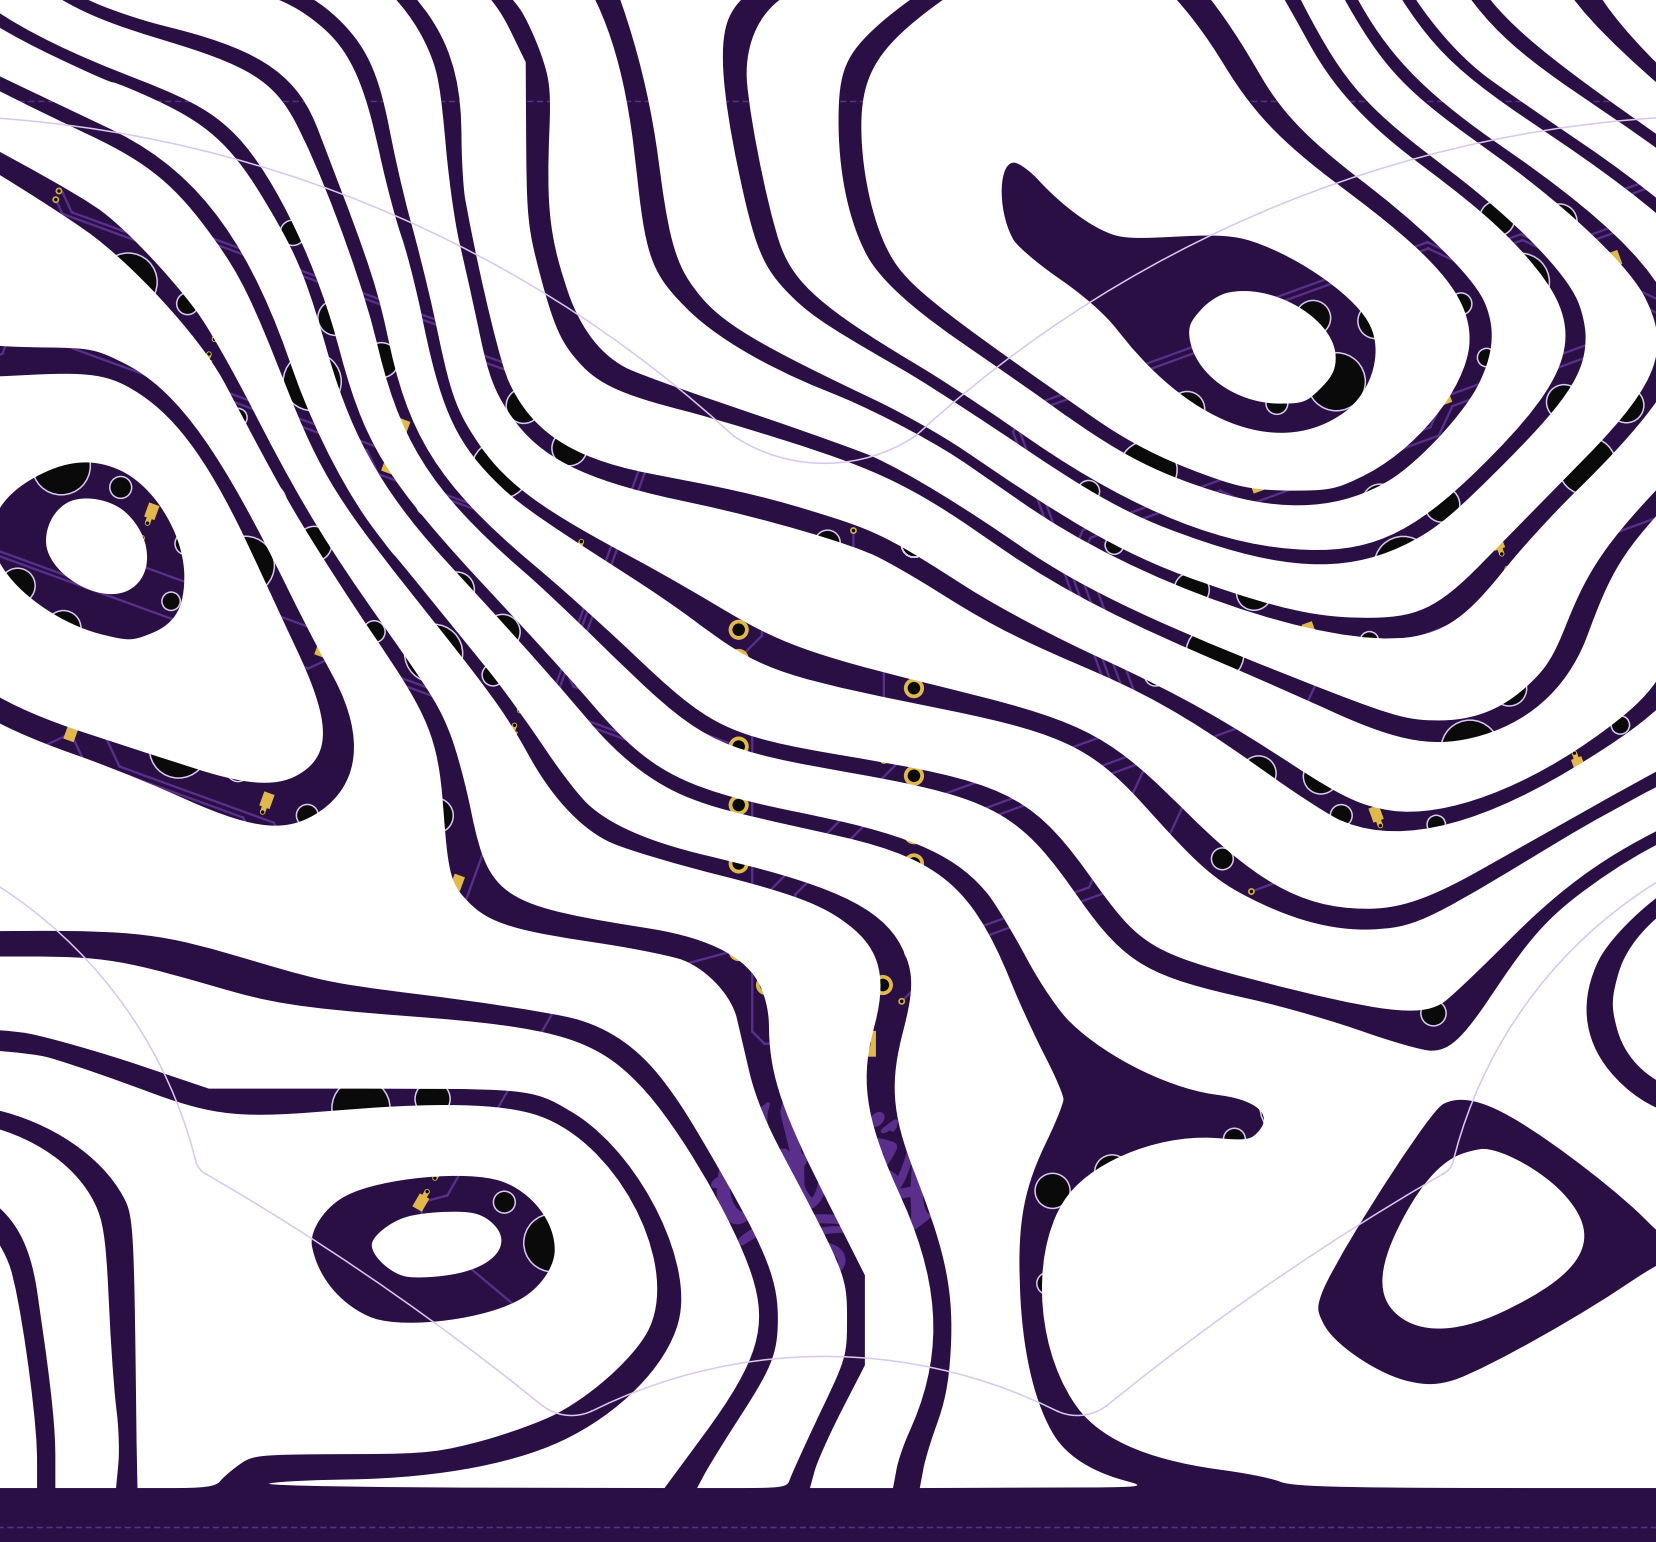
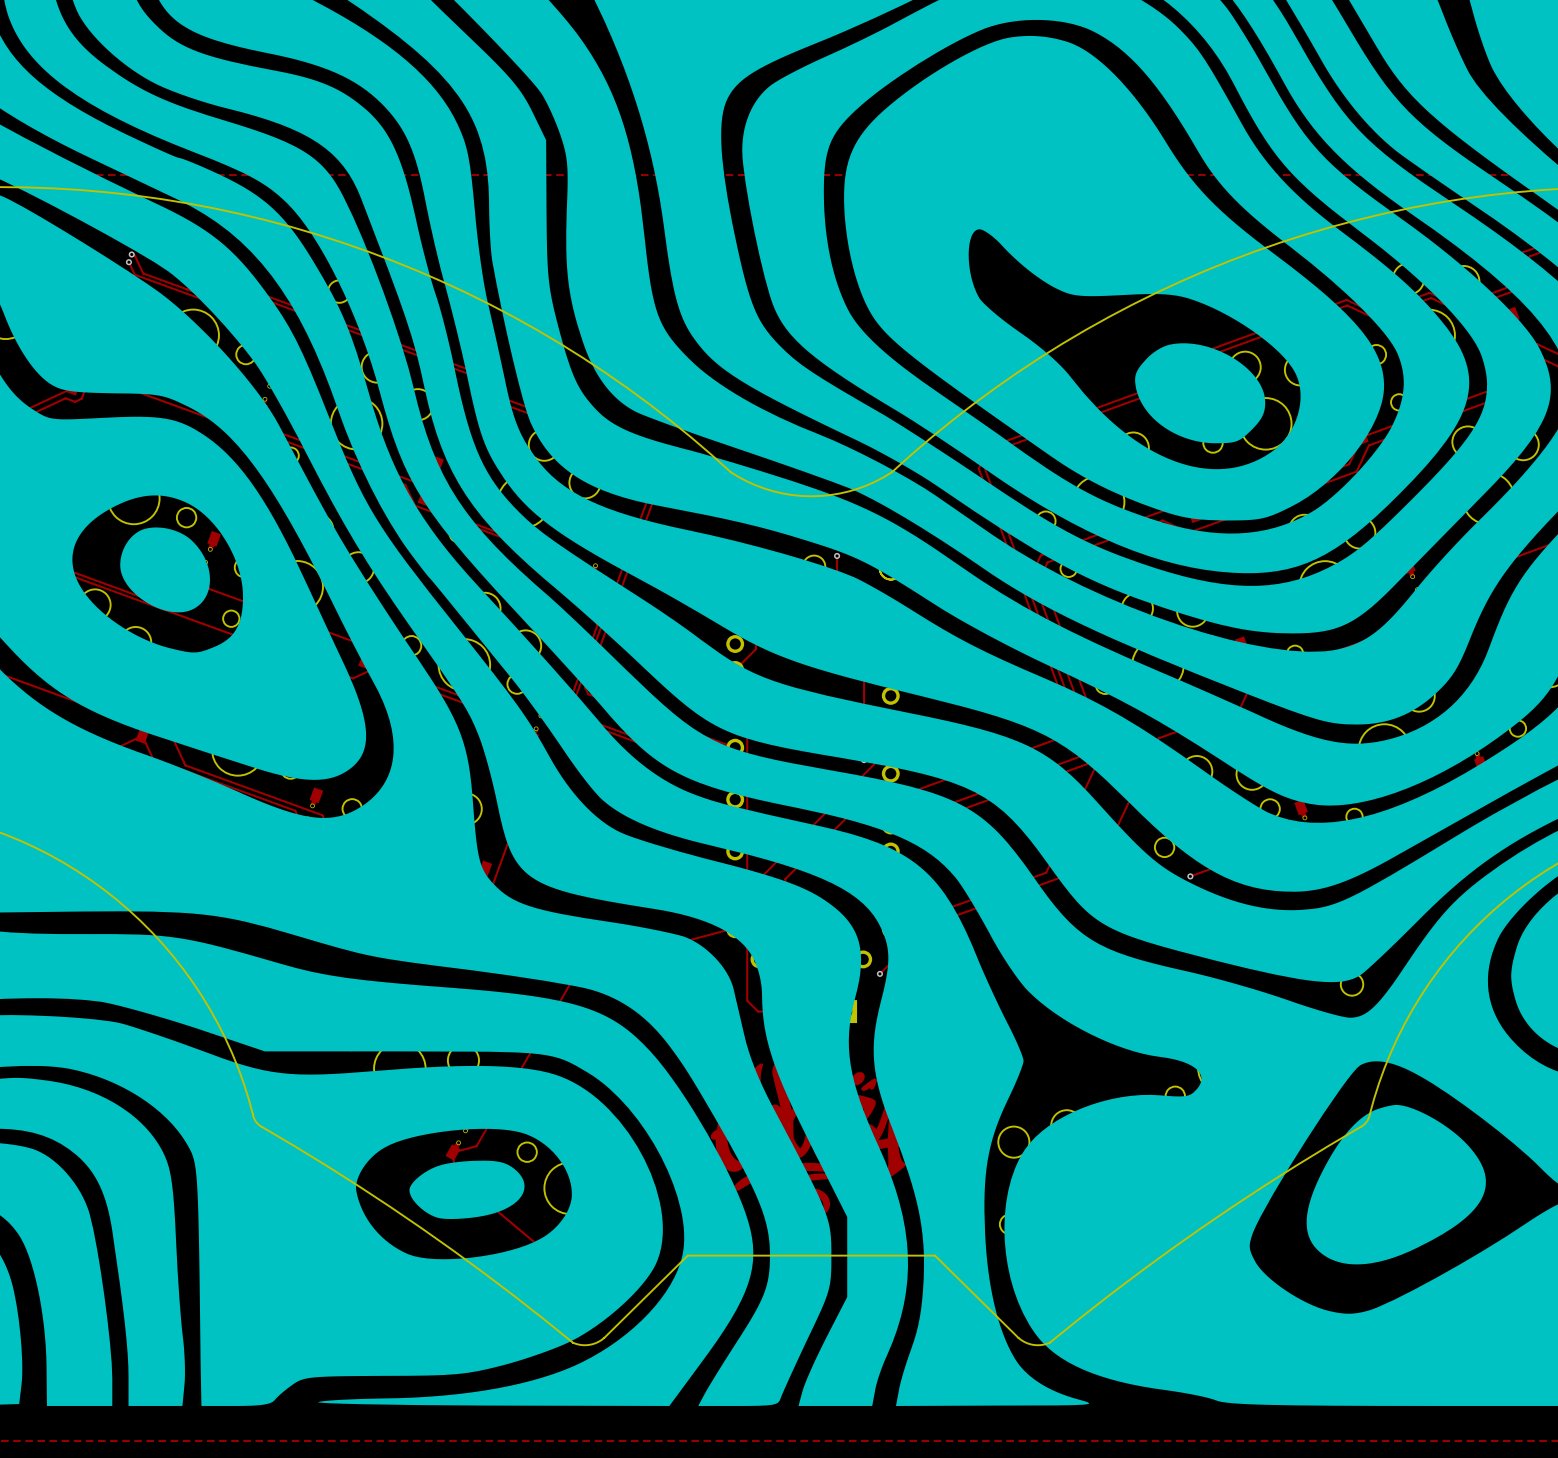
board edge: (205, 1173) (344, 1260) (445, 1330) (542, 1405) (560, 1414) (571, 1415) (586, 1413) (646, 1387) (704, 1370) (764, 1359) (824, 1356) (884, 1359) (944, 1370) (1002, 1387) (1062, 1413) (1077, 1415) (1093, 1412) (1102, 1408) (1203, 1330) (1270, 1283) (1338, 1237) (1443, 1173) -> (262, 1127) (390, 1207) (483, 1272) (572, 1342) (585, 1345) (595, 1343) (604, 1337) (687, 1255) (934, 1255) (1018, 1337) (1033, 1344) (1046, 1343) (1200, 1228) (1263, 1186) (1360, 1127)

